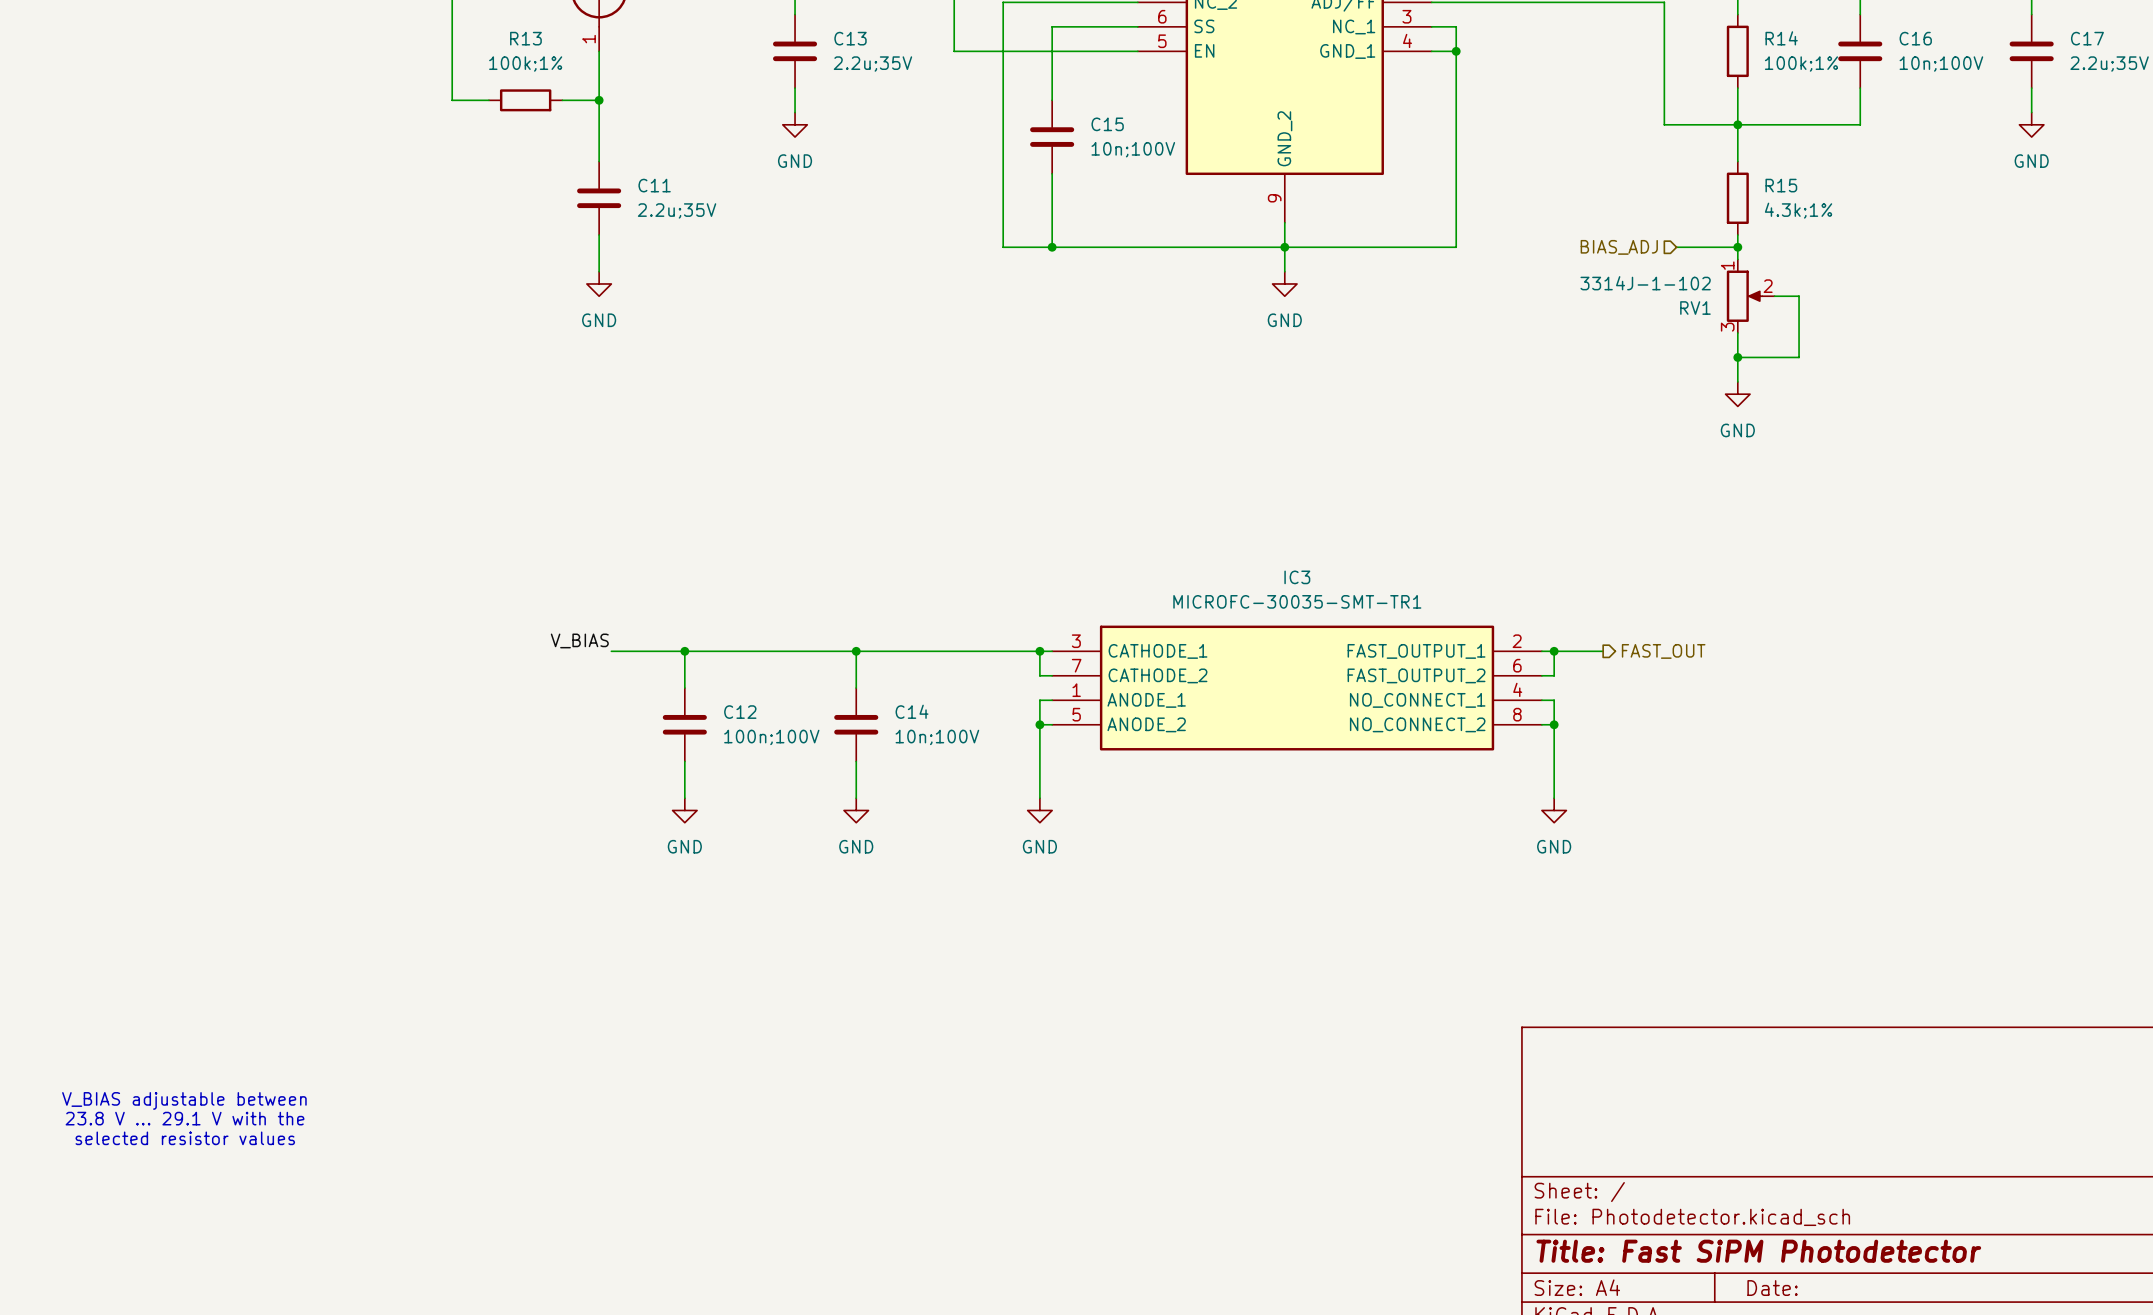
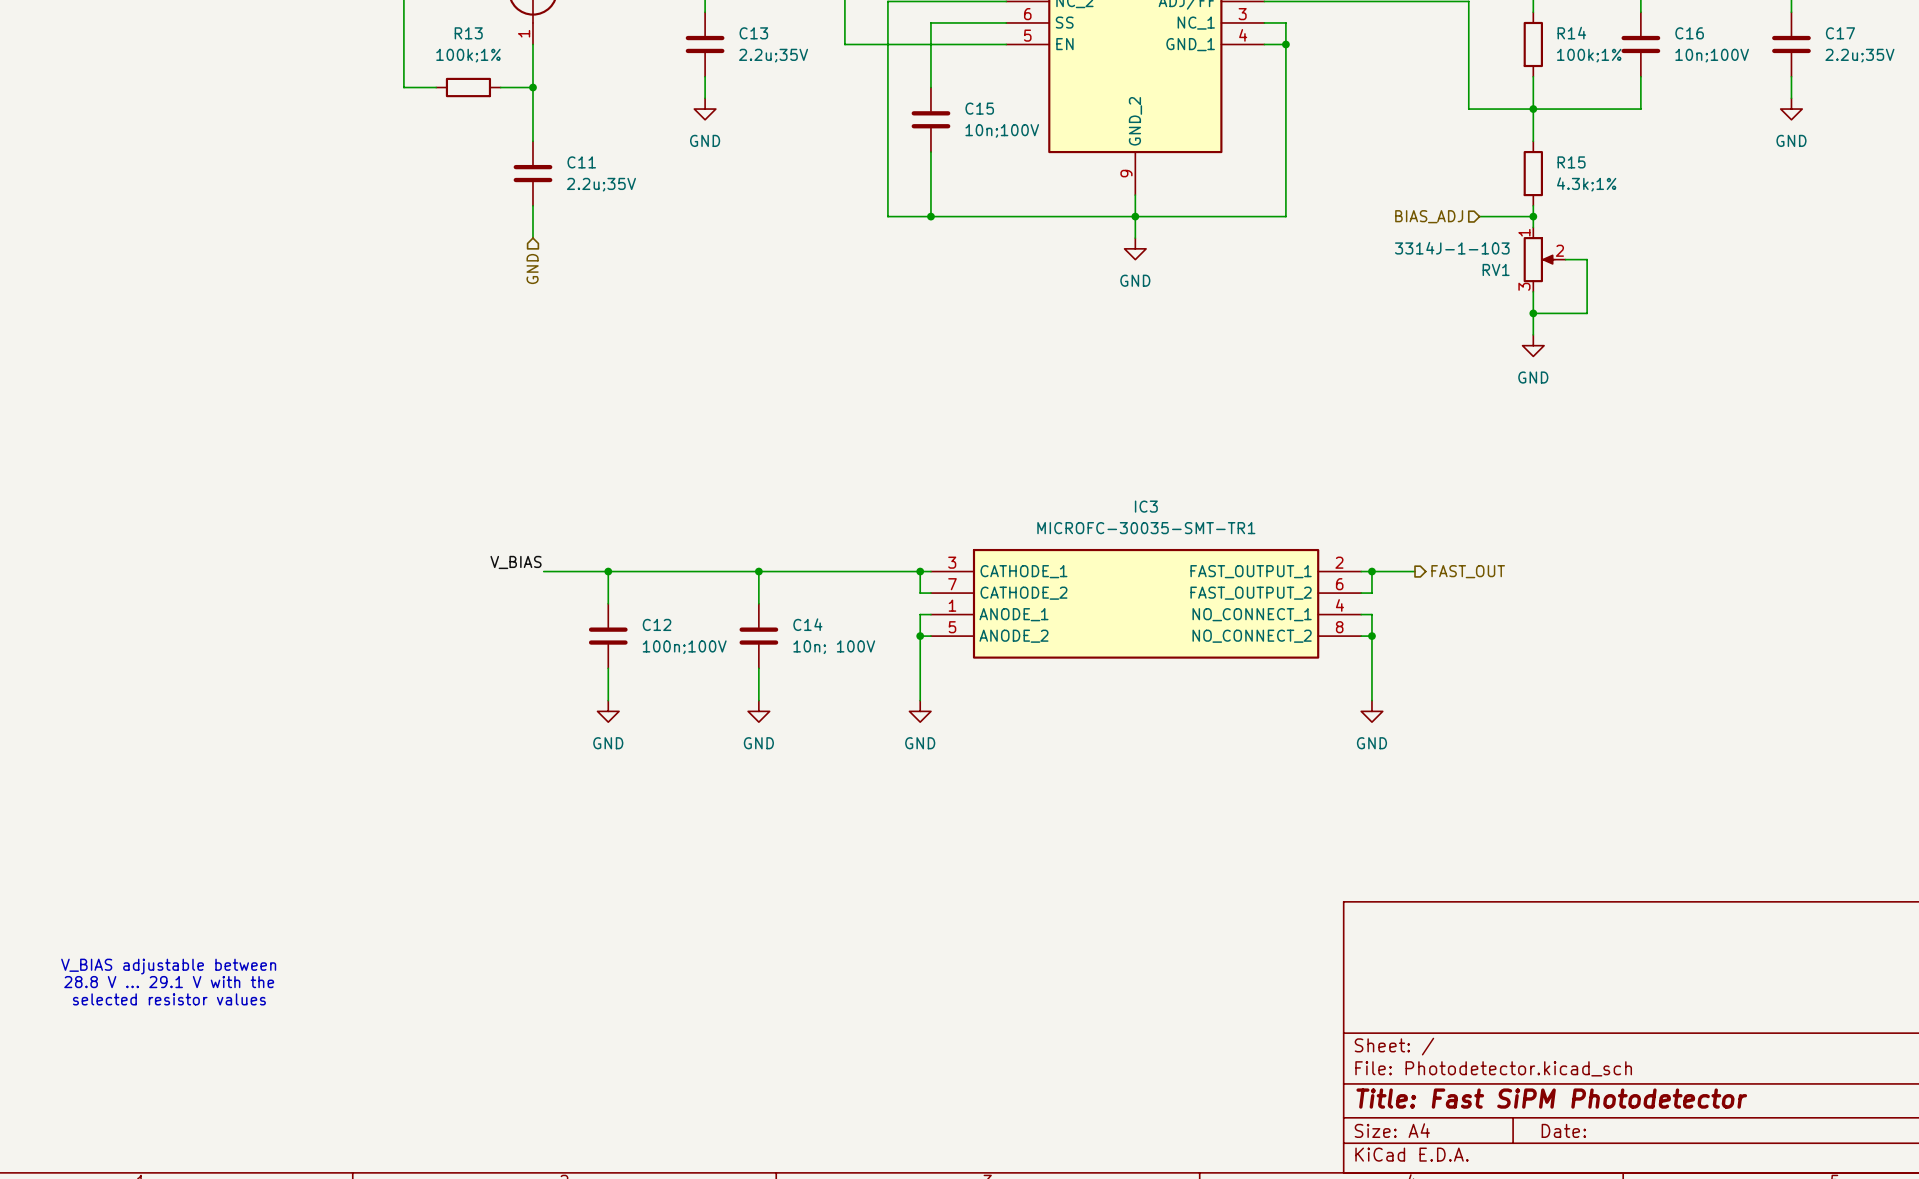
power symbol: GND (599, 283) -> none
RV1 value: 3314J-1-102 (1645, 283) -> 3314J-1-103 (1452, 248)
hierarchical label: none -> GND (532, 269)
C14 value: 10n;100V (937, 737) -> 10n; 100V (834, 647)
text: 23.8 V ... 29.1 V with the (184, 1118) -> 28.8 V ... 29.1 V with the (169, 982)

